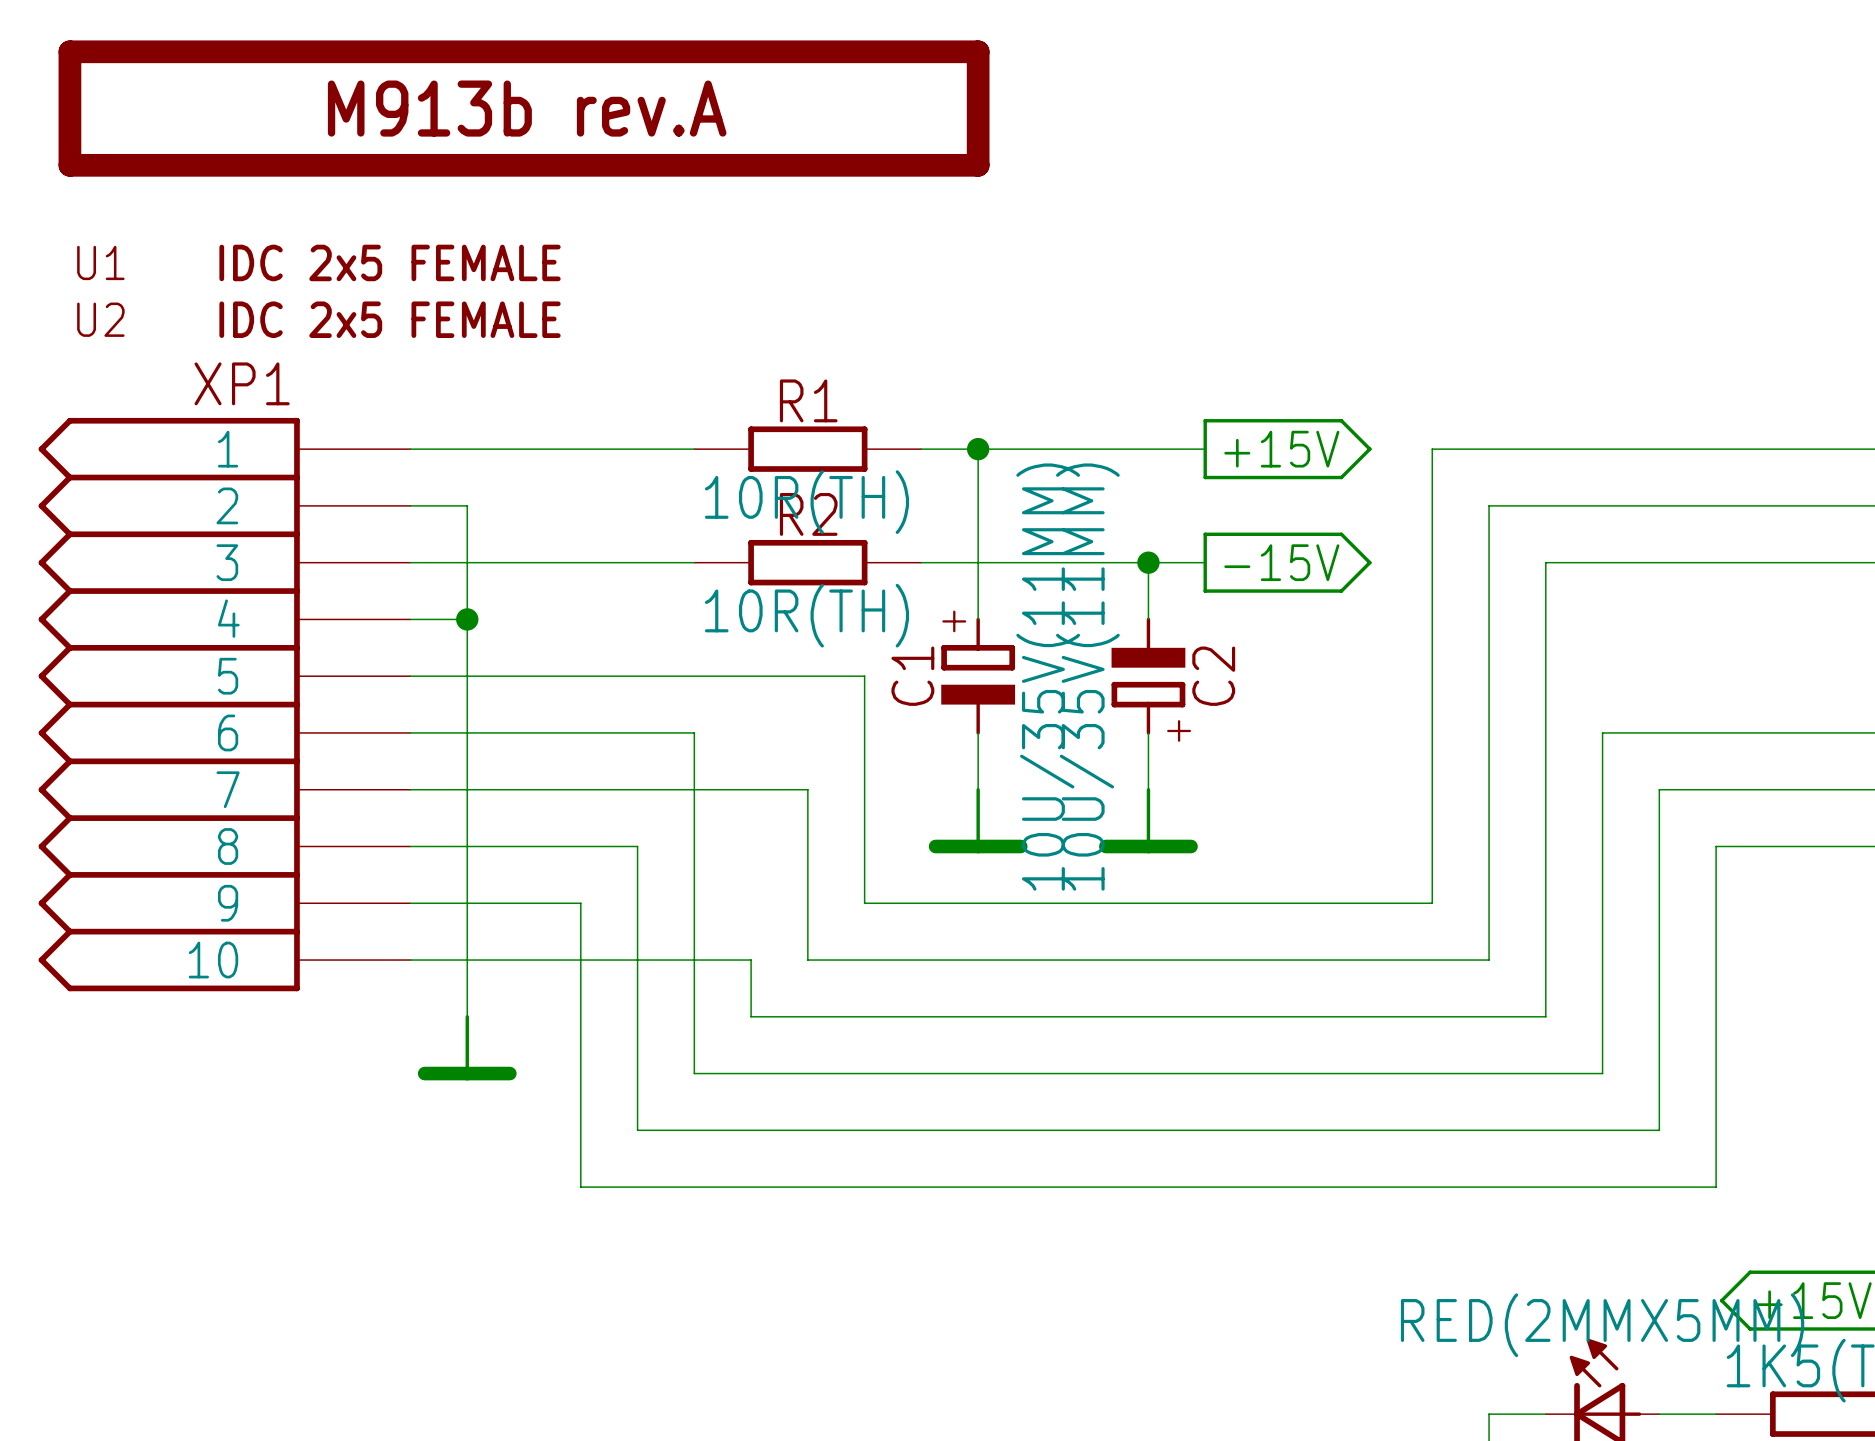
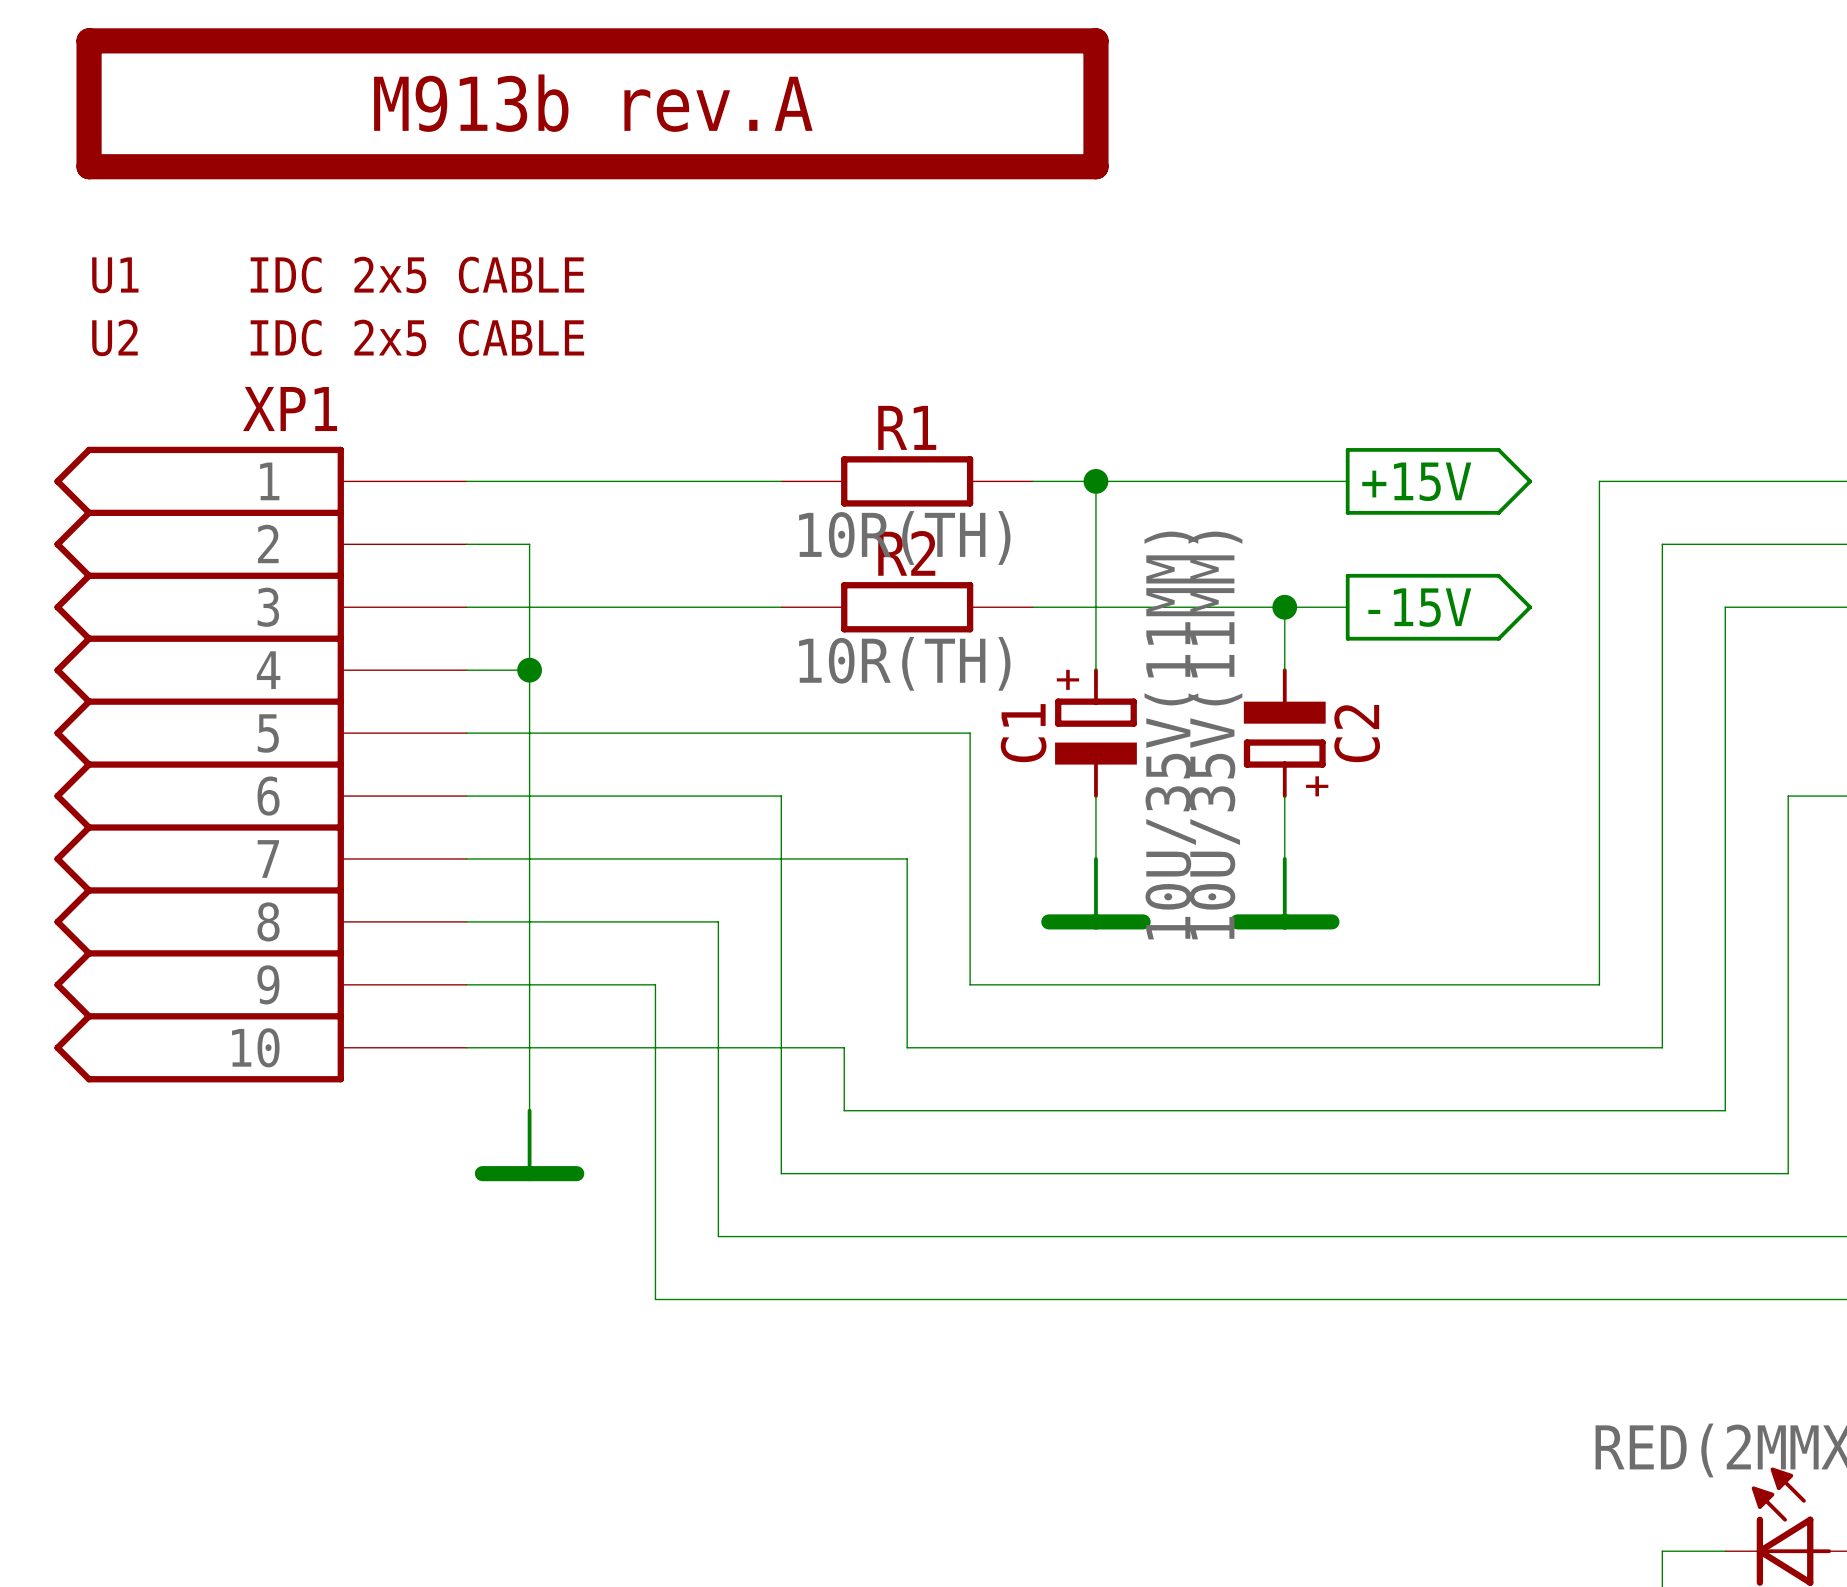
U1 position: (318, 262) -> (338, 275)
U1 value: IDC 2x5 FEMALE (390, 262) -> IDC 2x5 CABLE (417, 275)
U2 position: (318, 319) -> (338, 337)
U2 value: IDC 2x5 FEMALE (390, 319) -> IDC 2x5 CABLE (417, 337)

